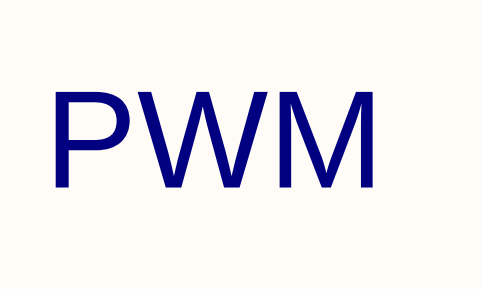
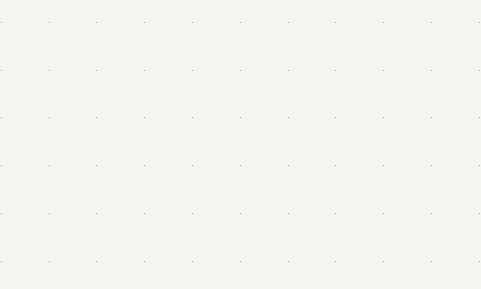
text: PWM (214, 139) -> none

